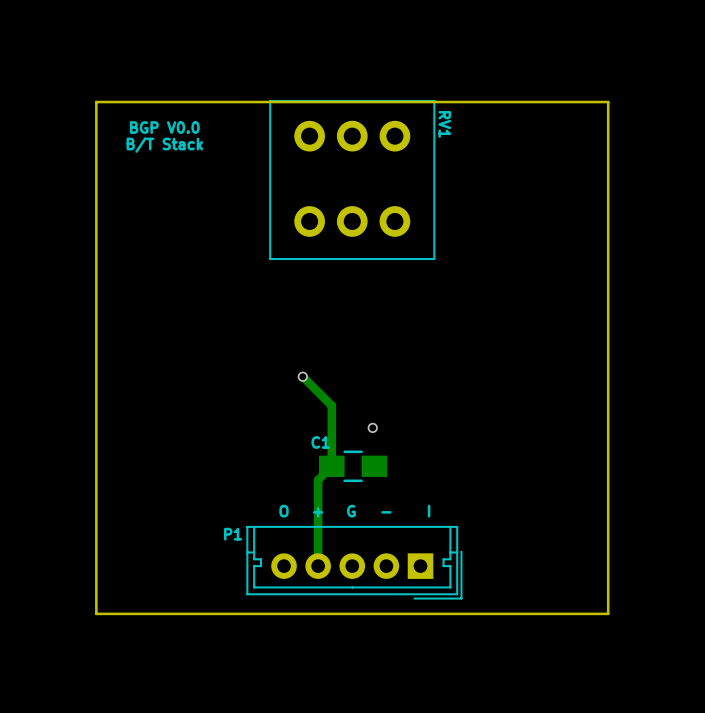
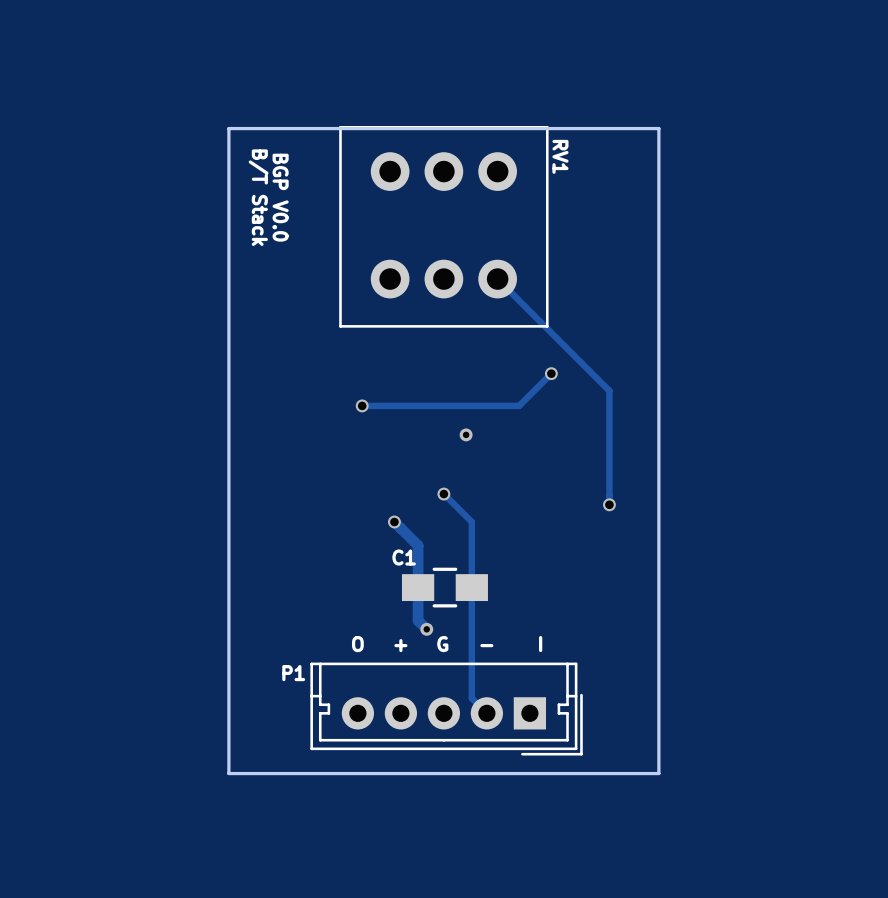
board edge: (181, 102) (96, 102) (96, 613) (181, 613) -> (228, 128) (228, 773)
board edge: (522, 102) (608, 102) (608, 613) (522, 613) -> (658, 128) (658, 773)
text rotation: 0° (164, 127) -> 90° clockwise (280, 197)
text rotation: 0° (164, 144) -> 90° clockwise (258, 197)
track: none -> (497, 279) (609, 390) (609, 504)
track: none -> (551, 373) (519, 405) (362, 405)
via: none -> (551, 373)
via: none -> (362, 405)
via: none -> (466, 434)
track: (302, 376) (331, 405) (331, 433) -> (394, 522) (418, 545)
via: (302, 376) -> none
track: none -> (443, 494) (471, 522) (471, 698) (486, 713)
via: none -> (443, 494)
via: none -> (609, 504)
via: none -> (394, 522)
via: (372, 427) -> none
track: (331, 466) (318, 479) (318, 566) -> (418, 587) (418, 620) (426, 629)
via: none -> (426, 629)

